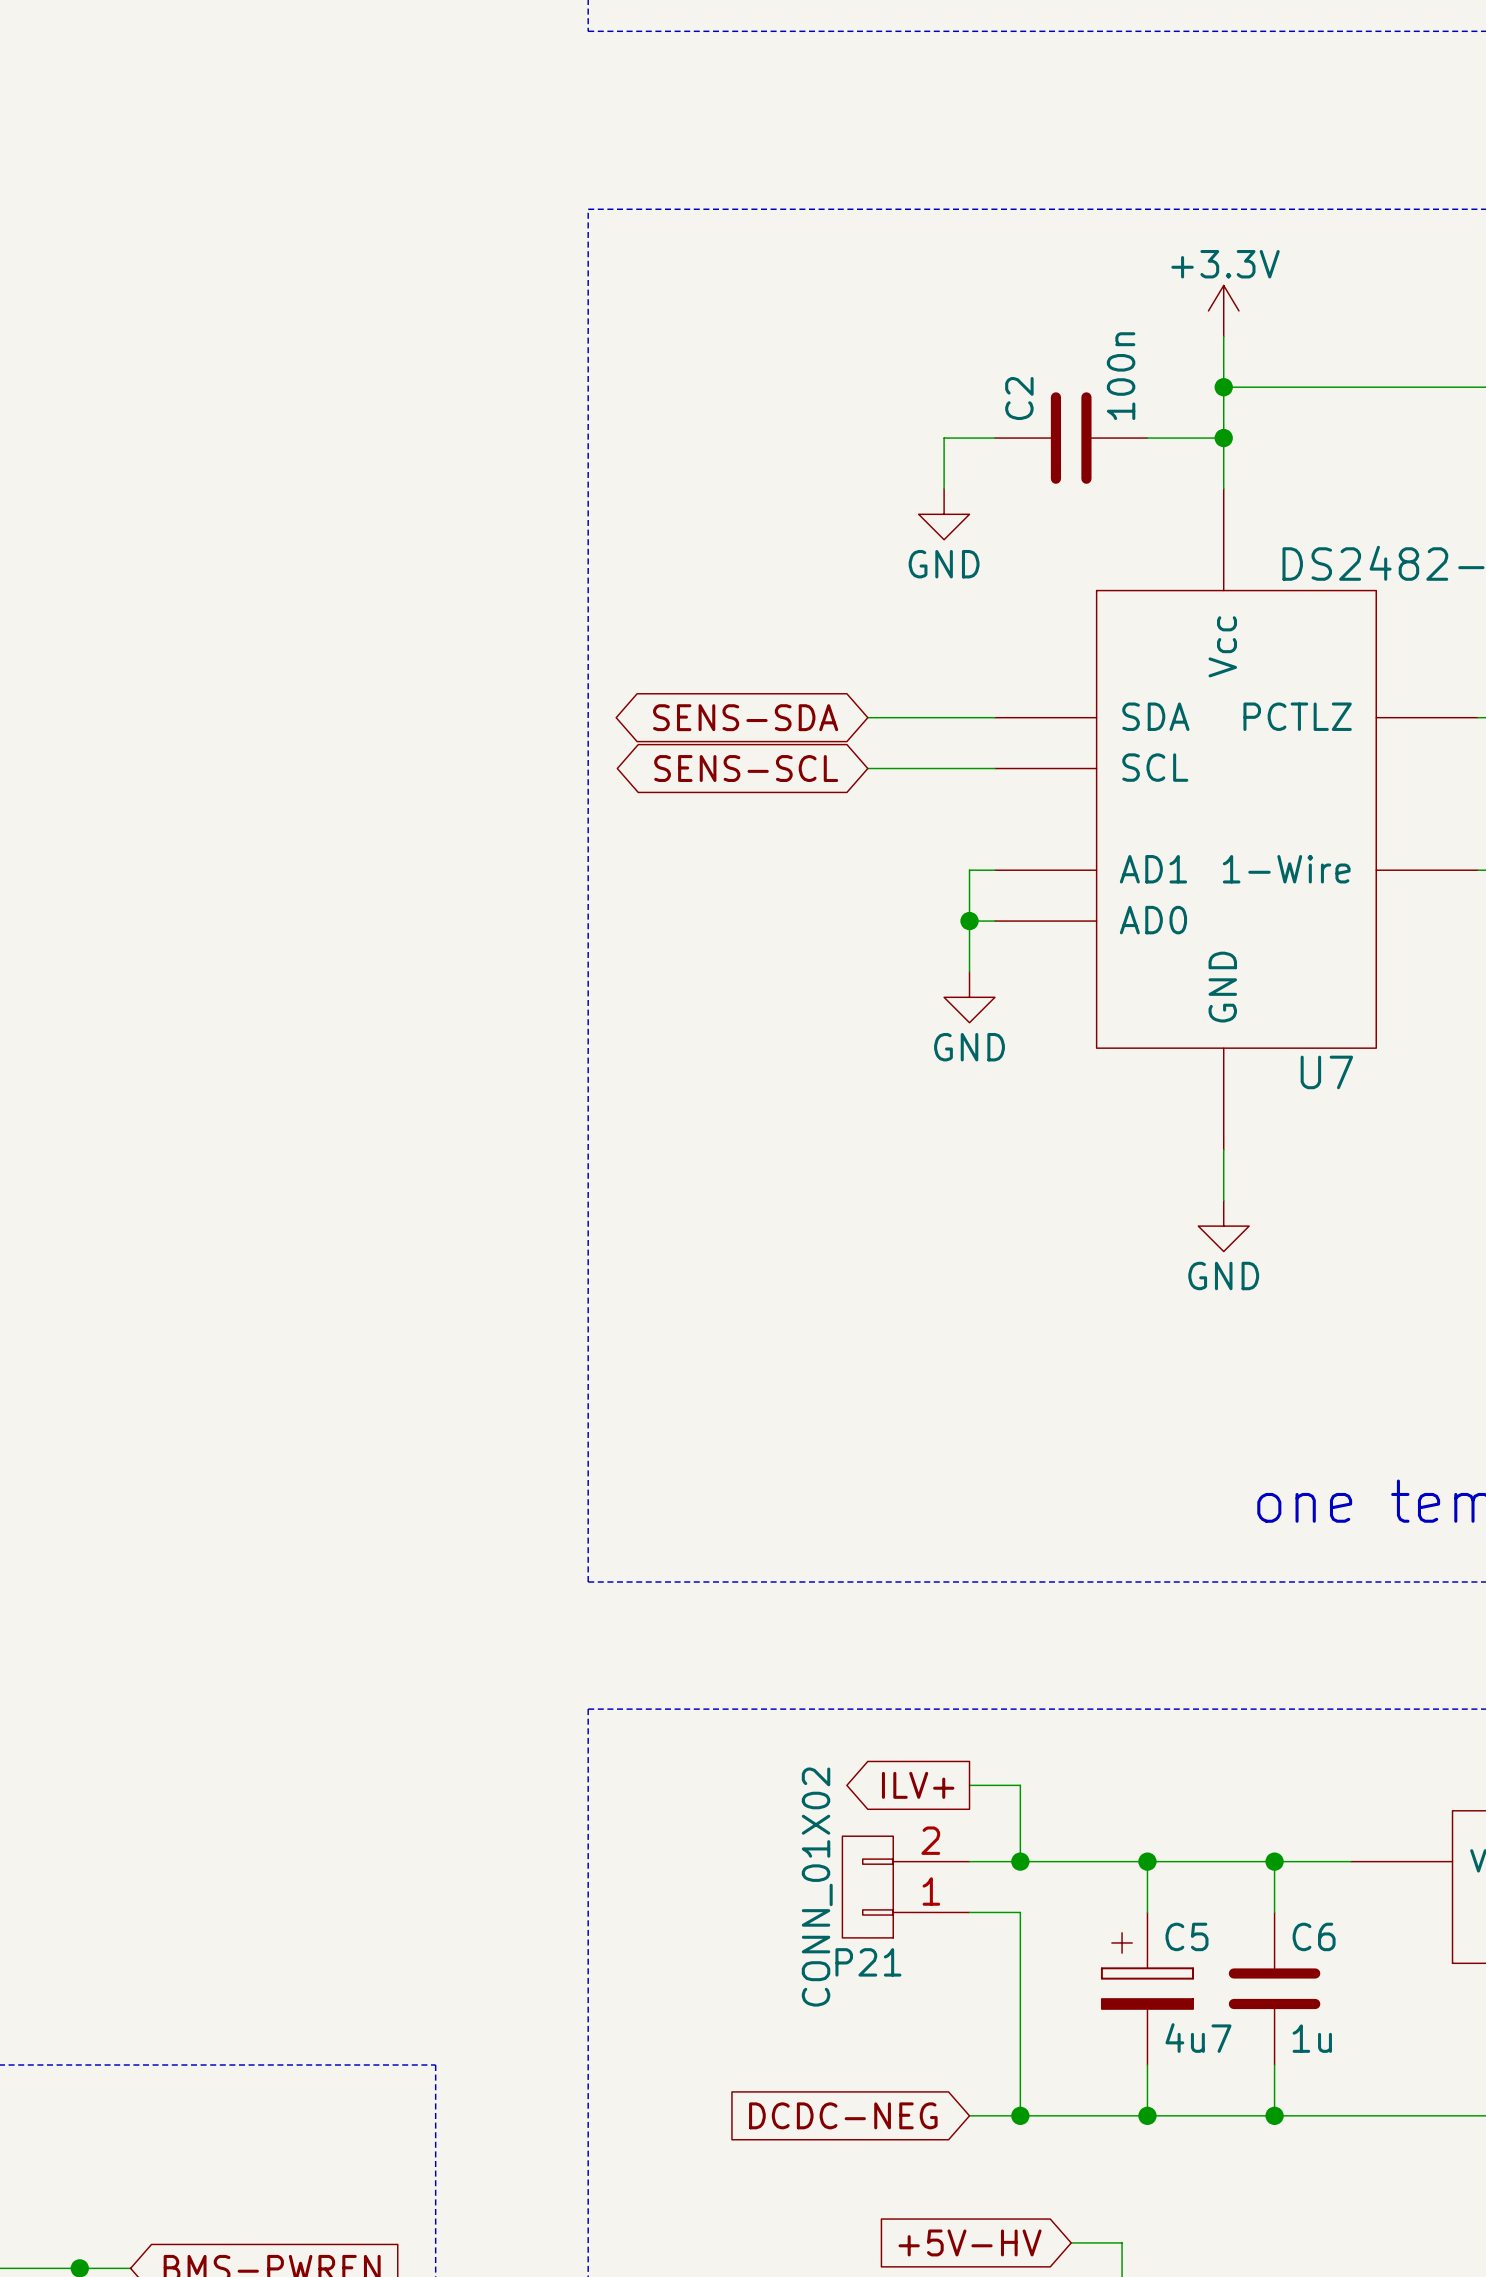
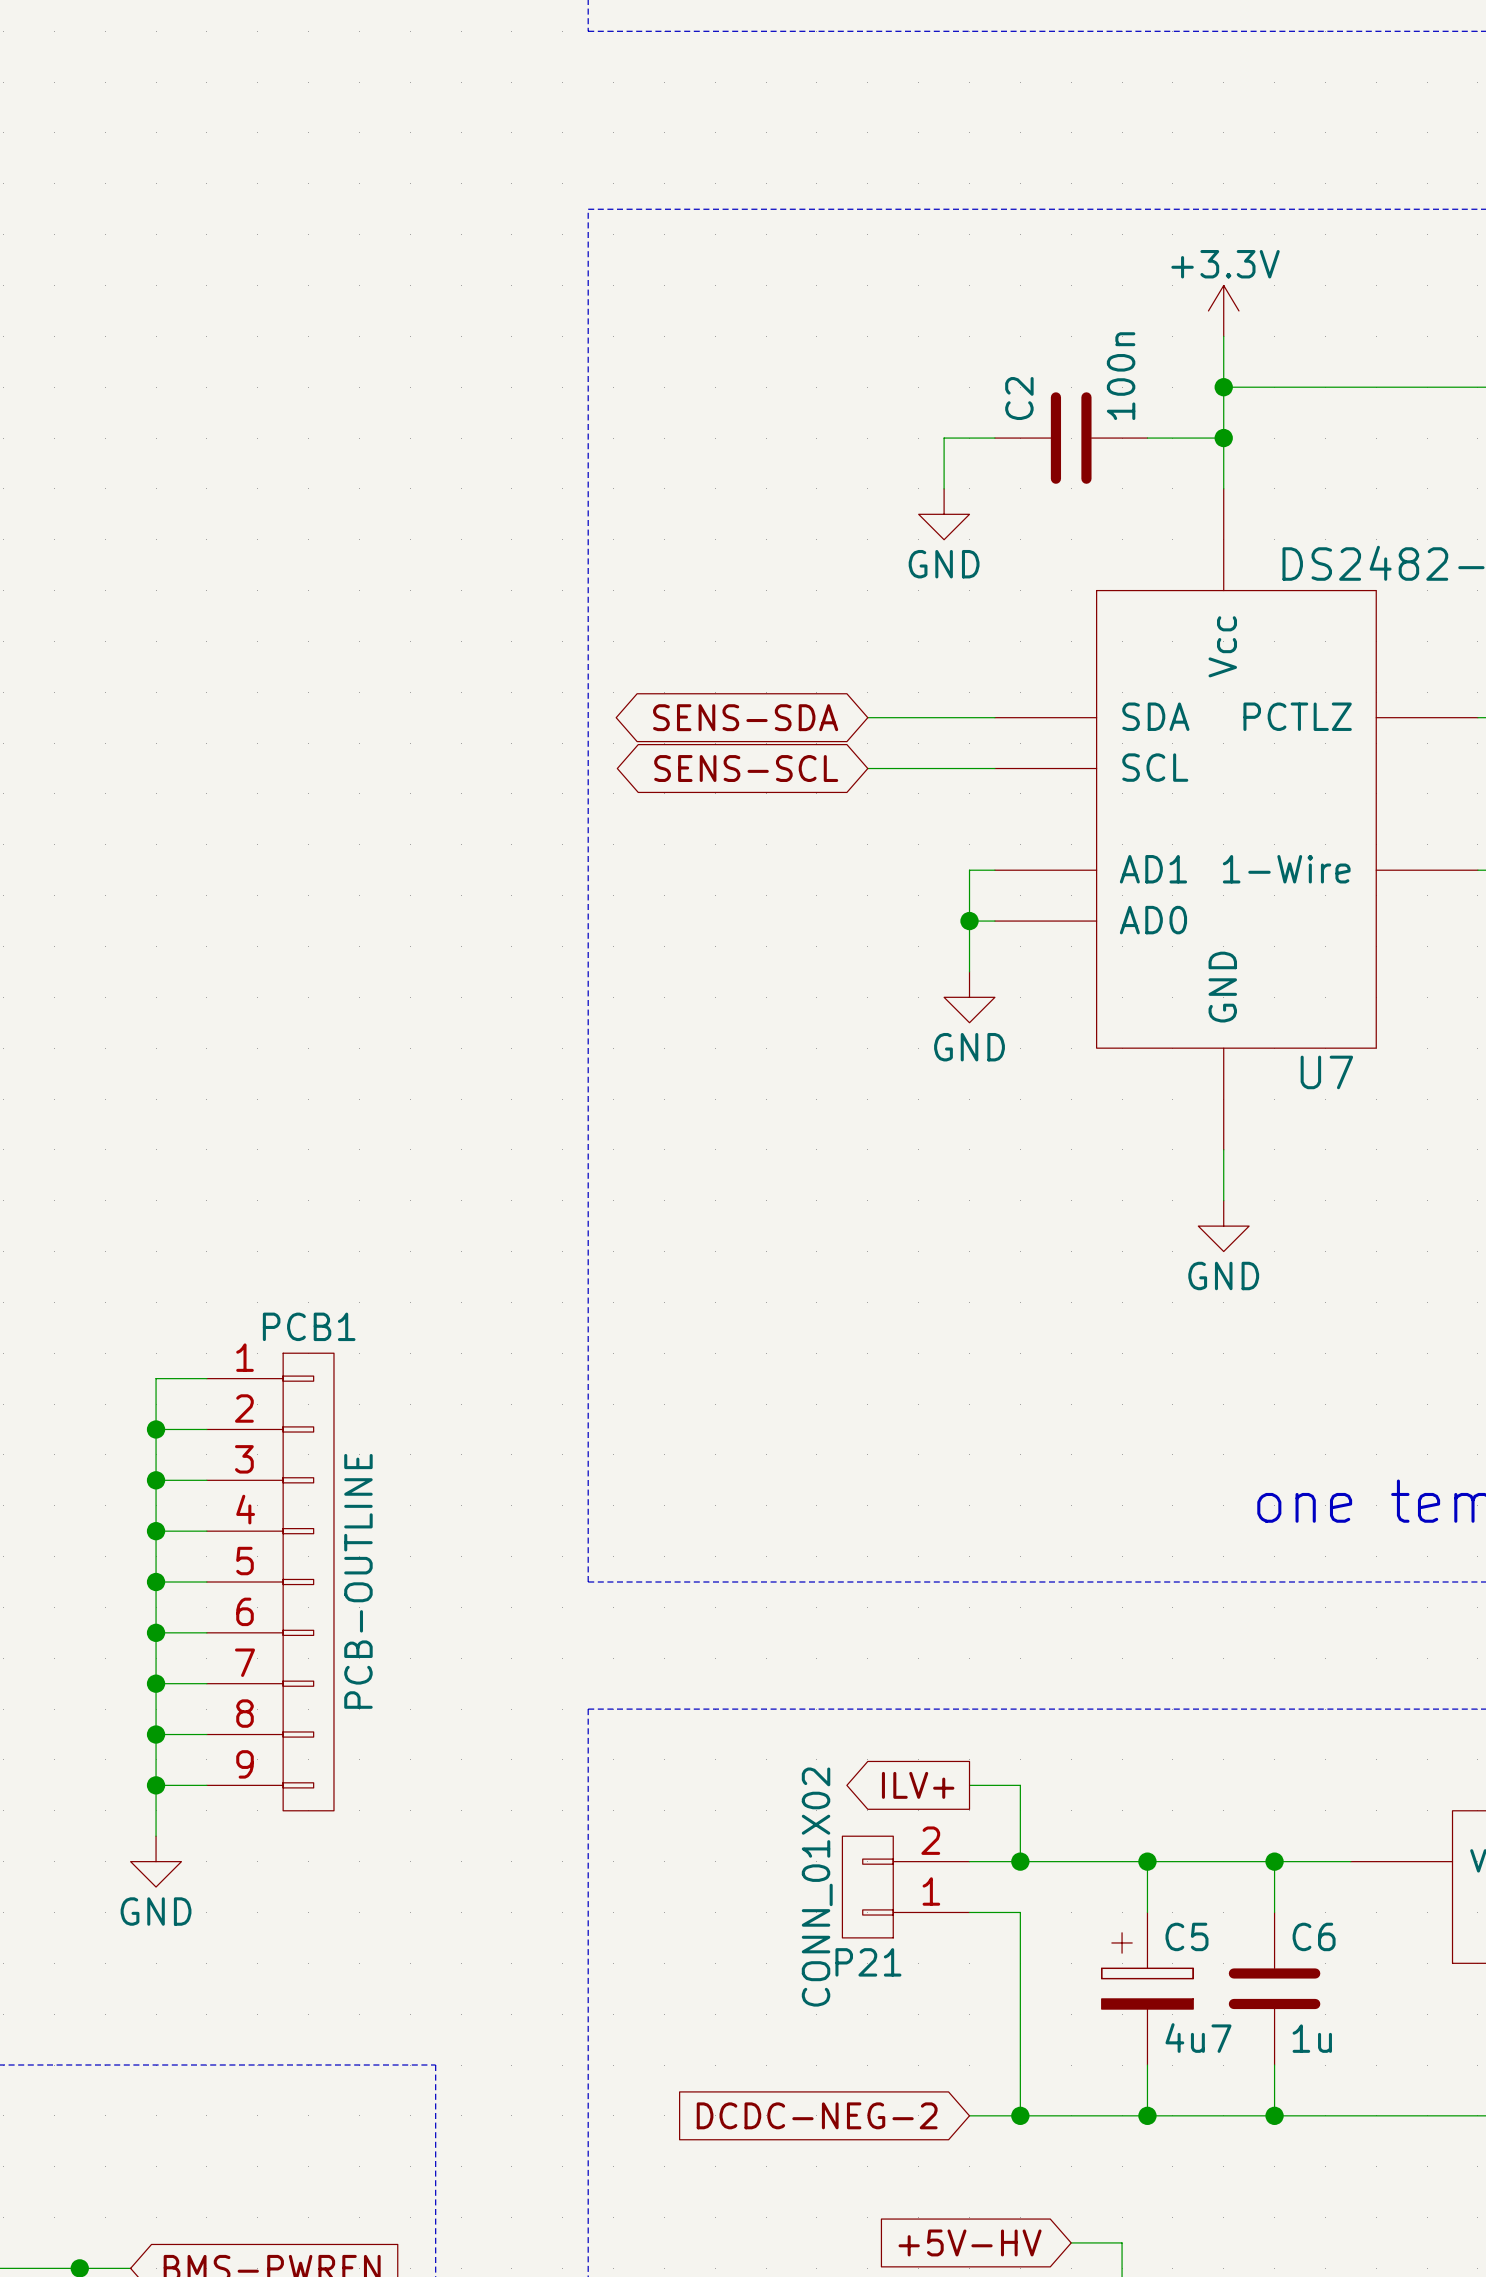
wire: none -> (206, 1378) (156, 1378) (156, 1836)
wire: none -> (156, 1429) (206, 1429)
junction: none -> (156, 1429)
wire: none -> (156, 1480) (206, 1480)
junction: none -> (156, 1480)
wire: none -> (156, 1531) (206, 1531)
junction: none -> (156, 1531)
wire: none -> (156, 1582) (206, 1582)
junction: none -> (156, 1582)
PCB1: none -> PCB-OUTLINE (270, 1582)
wire: none -> (156, 1632) (206, 1632)
junction: none -> (156, 1632)
wire: none -> (156, 1683) (206, 1683)
junction: none -> (156, 1683)
wire: none -> (156, 1734) (206, 1734)
junction: none -> (156, 1734)
wire: none -> (156, 1785) (206, 1785)
junction: none -> (156, 1785)
power symbol: none -> GND (156, 1861)
global label: DCDC-NEG (843, 2115) -> DCDC-NEG-2 (817, 2115)

